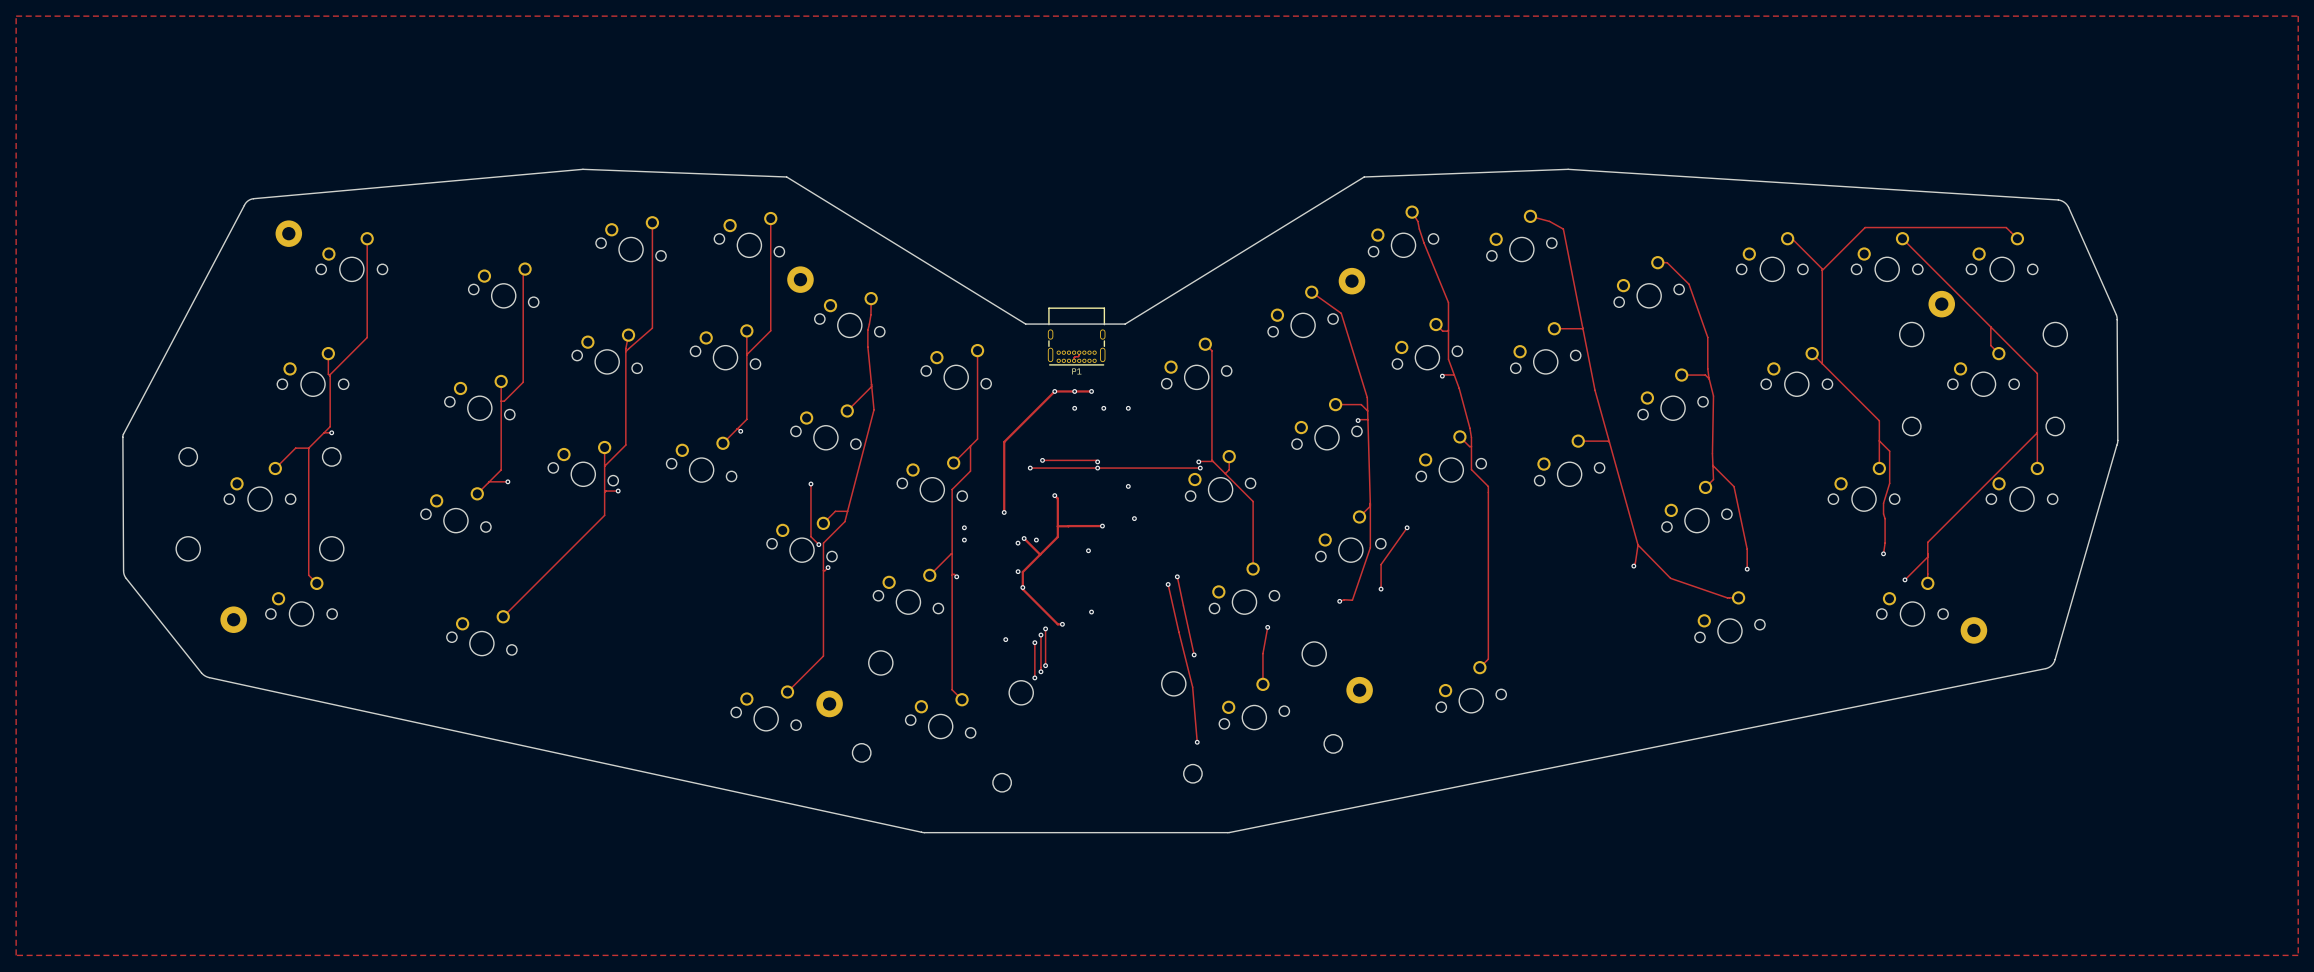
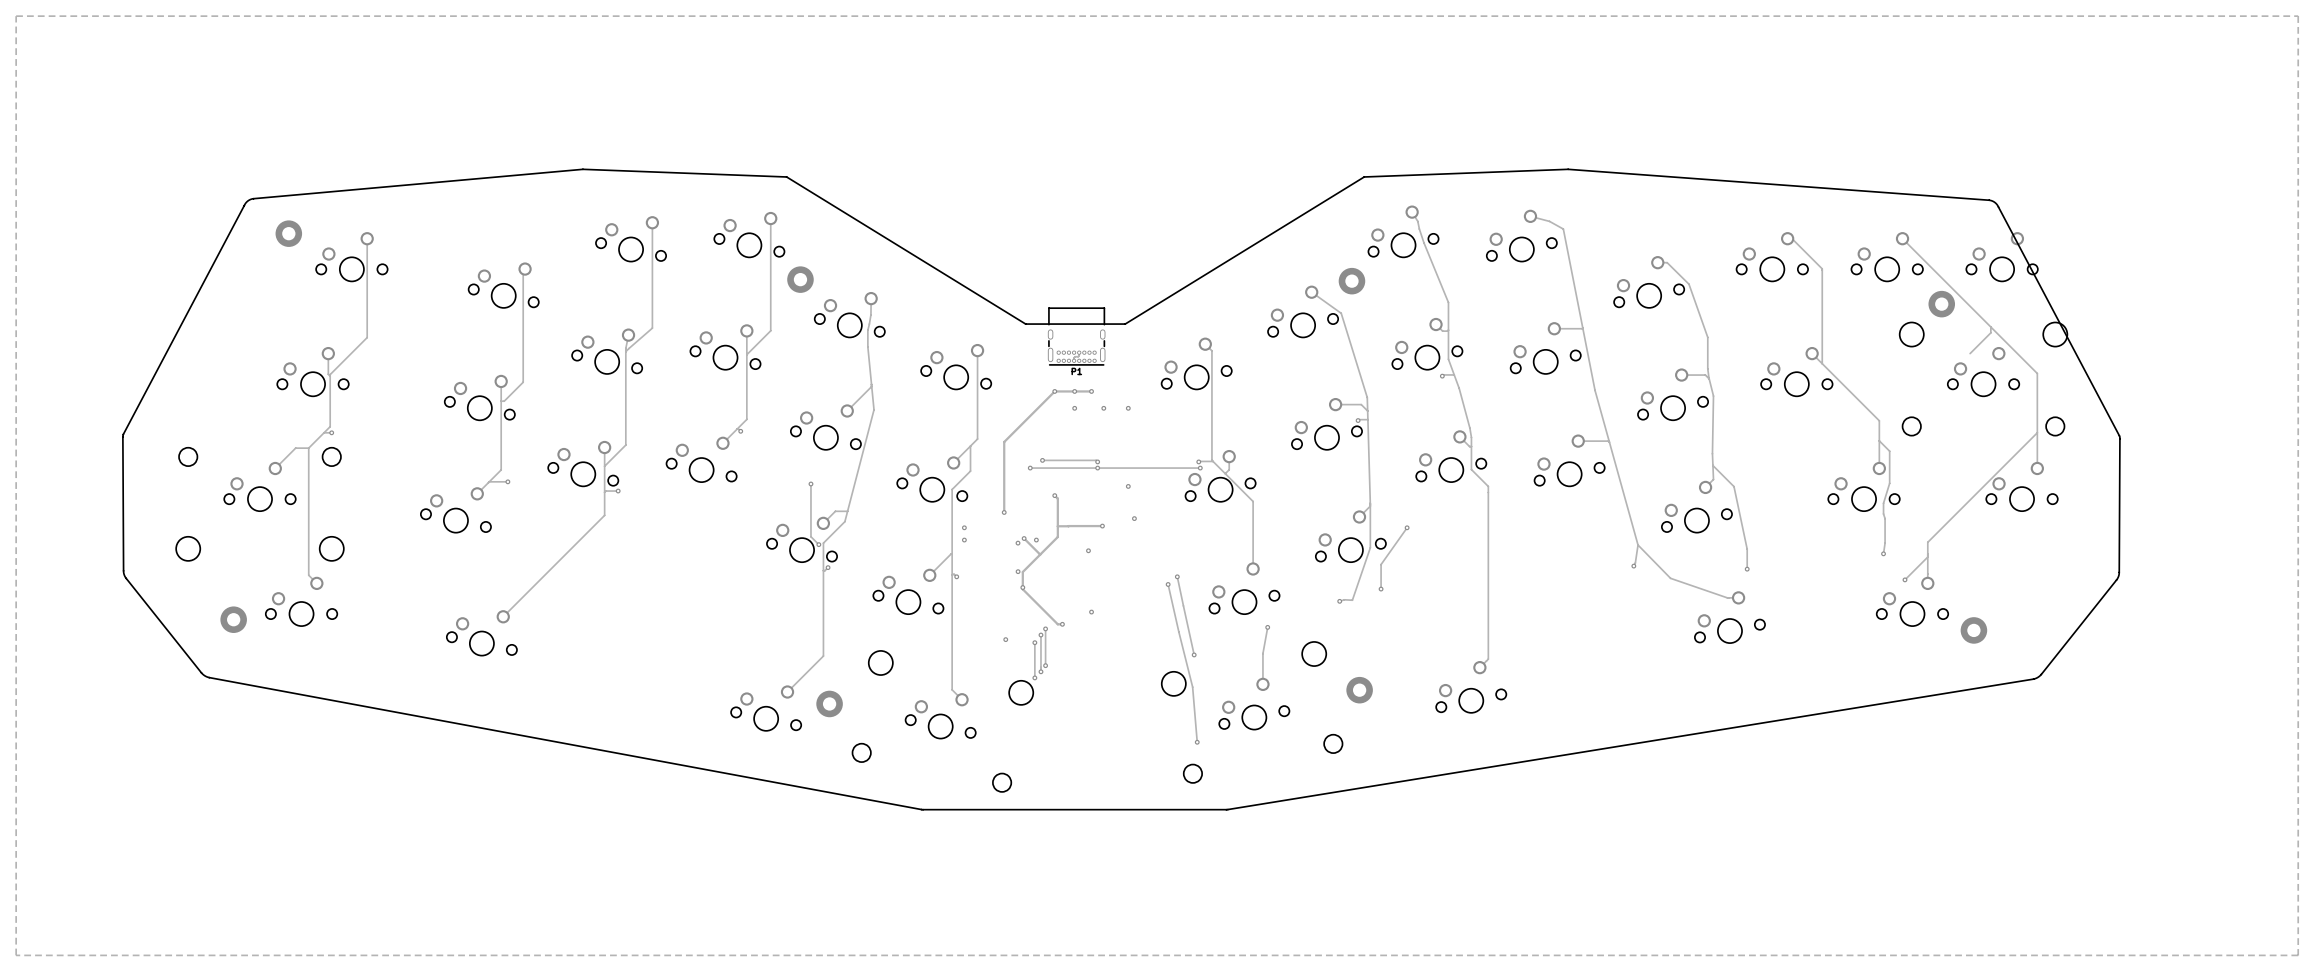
board edge: (1568, 169) (2058, 199) (2065, 203) (2116, 316) (2117, 440) (2055, 659) (2051, 665) (2045, 668) (1227, 832) (923, 832) (209, 677) -> (1568, 169) (1989, 200) (1996, 204) (2119, 438) (2118, 576) (2040, 675) (2033, 679) (1226, 809) (921, 809) (209, 677)
track: (2017, 238) (2006, 227) (1865, 227) (1822, 270) -> none
track: (1990, 332) (1990, 345) (1998, 353) -> (1990, 332) (1970, 353)

